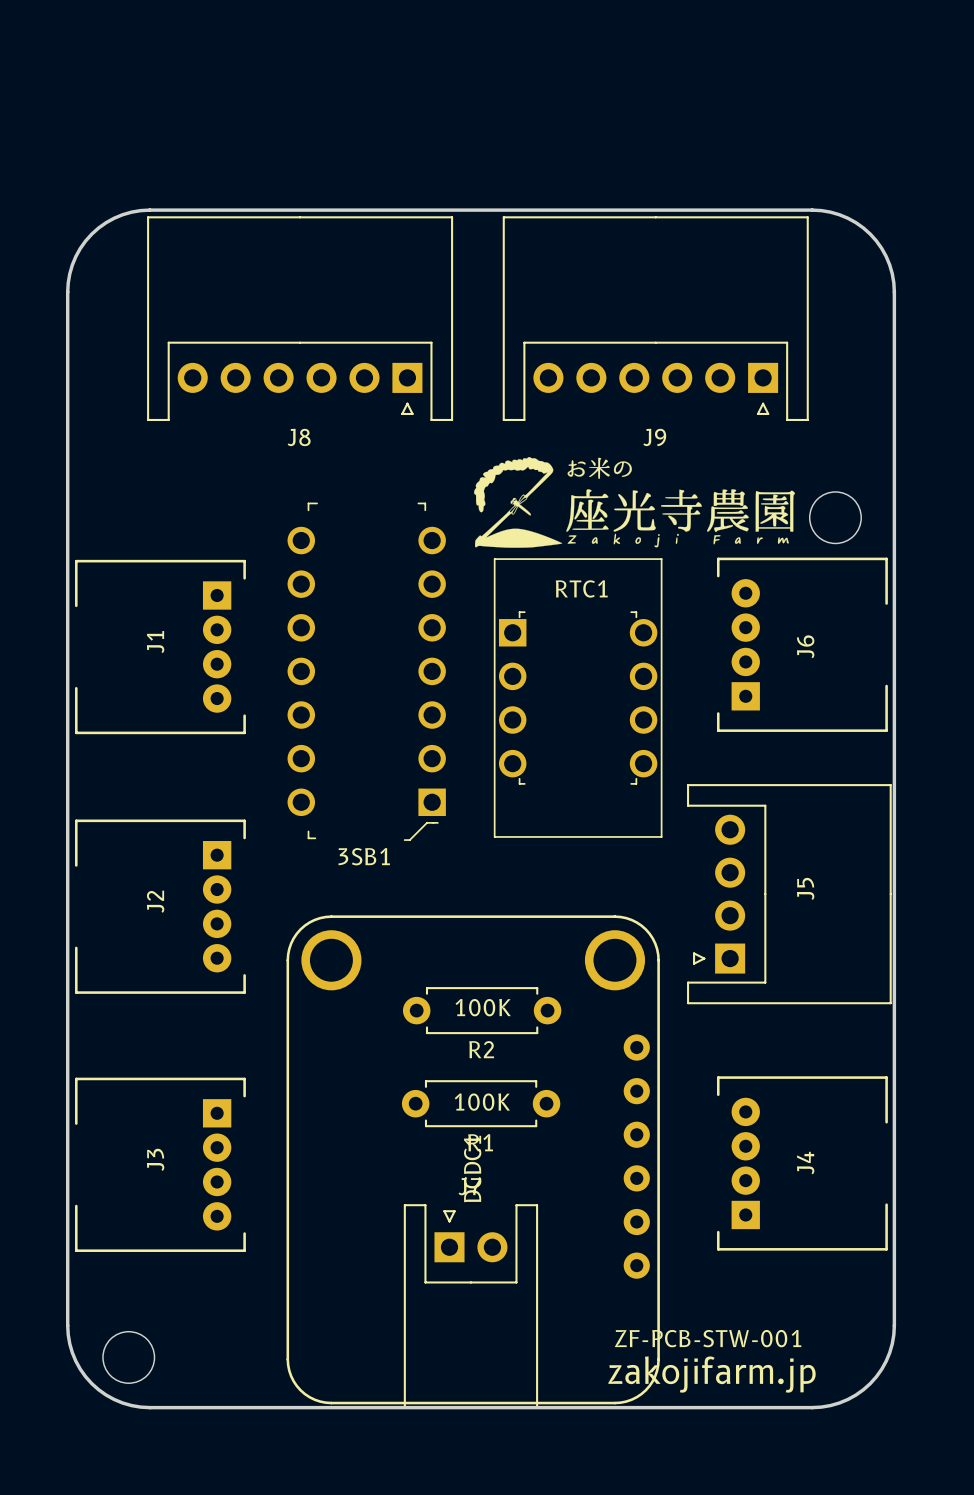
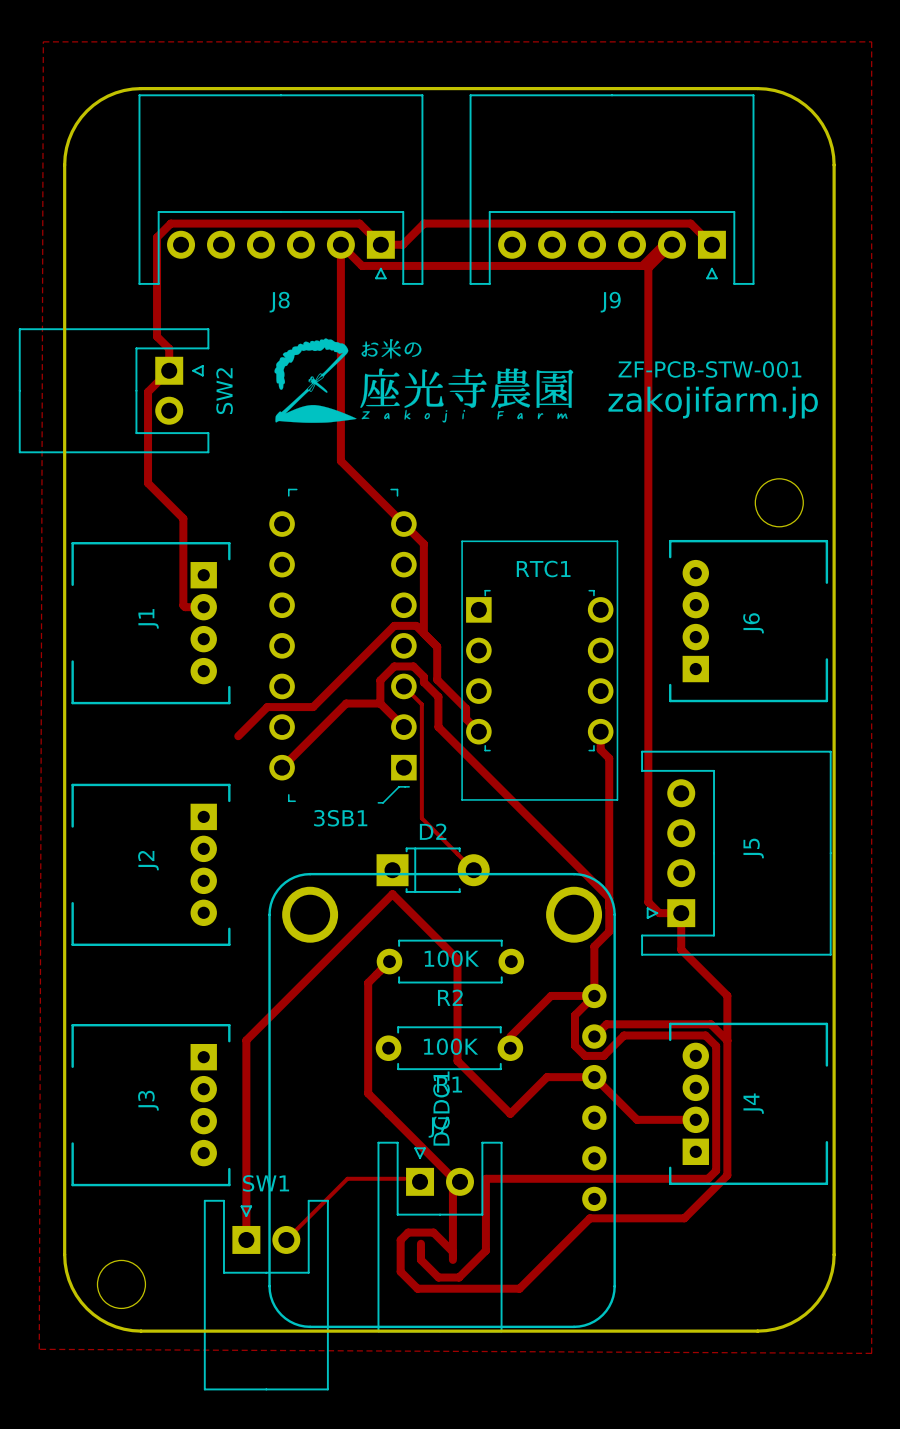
zone outline: none -> (43, 41) (871, 41) (871, 1353) (39, 1349) (43, 41)
track: none -> (711, 244) (690, 223) (424, 223) (402, 244) (380, 244) (359, 223) (170, 223) (157, 237) (157, 336) (169, 348) (169, 370) (148, 391) (148, 483) (183, 518) (183, 605) (185, 607) (203, 607)
board edge: (67, 292) (72, 265) (80, 248) (91, 234) (114, 218) (131, 212) (149, 210) (821, 210) (847, 218) (863, 228) (876, 241) (889, 265) (894, 292) -> (64, 292) (64, 165) (68, 139) (81, 117) (100, 100) (124, 90) (141, 88) (757, 88) (782, 92) (805, 105) (817, 117) (826, 131) (832, 147) (834, 165) (834, 292)
J8 position: (300, 318) -> (280, 189)
J9 position: (655, 318) -> (612, 189)
text: none -> ZF-PCB-STW-001 (709, 369)
SW2: none -> (114, 390)
text: none -> zakojifarm.jp (713, 402)
drawing position: (634, 502) -> (423, 380)
track: none -> (423, 633) (423, 544) (340, 461) (340, 244) (362, 265) (642, 265) (663, 244) (671, 244) (648, 268) (648, 902) (659, 913) (681, 913) (681, 949) (727, 995) (727, 1175) (684, 1218) (589, 1218) (519, 1288) (417, 1288) (400, 1271) (400, 1240) (408, 1232) (433, 1232) (452, 1251)
track: none -> (403, 686) (421, 704) (421, 818) (473, 870)
track: none -> (380, 703) (403, 727)
track: none -> (380, 703) (380, 680) (394, 666) (413, 666) (423, 676) (423, 682) (438, 696) (438, 727) (609, 897)
track: none -> (380, 703) (346, 703) (282, 767)
track: none -> (478, 731) (466, 718) (466, 708) (437, 679) (437, 646) (416, 625) (394, 625) (313, 707) (267, 707) (238, 736)
track: none -> (600, 731) (600, 749) (609, 758) (609, 931) (594, 946) (594, 995)
D2: none -> (433, 870)
track: none -> (389, 961) (368, 982) (368, 1093) (452, 1178) (452, 1259)
track: none -> (594, 995) (551, 995) (510, 1036)
track: none -> (594, 995) (574, 1015) (574, 1045) (585, 1055) (603, 1055) (624, 1035) (705, 1035) (716, 1046) (716, 1170) (708, 1178) (485, 1178) (485, 1250) (459, 1277) (438, 1277) (420, 1259) (420, 1243)
track: none -> (594, 1036) (606, 1024) (710, 1024) (727, 1040)
track: none -> (695, 1119) (637, 1119) (594, 1077) (547, 1077) (510, 1113) (457, 1060) (457, 959) (392, 894) (246, 1040) (246, 1239)
track: none -> (404, 1178) (347, 1178) (286, 1239)
text: ZF-PCB-STW-001 (708, 1338) -> none
SW1: none -> (266, 1295)
text: zakojifarm.jp (711, 1374) -> none

